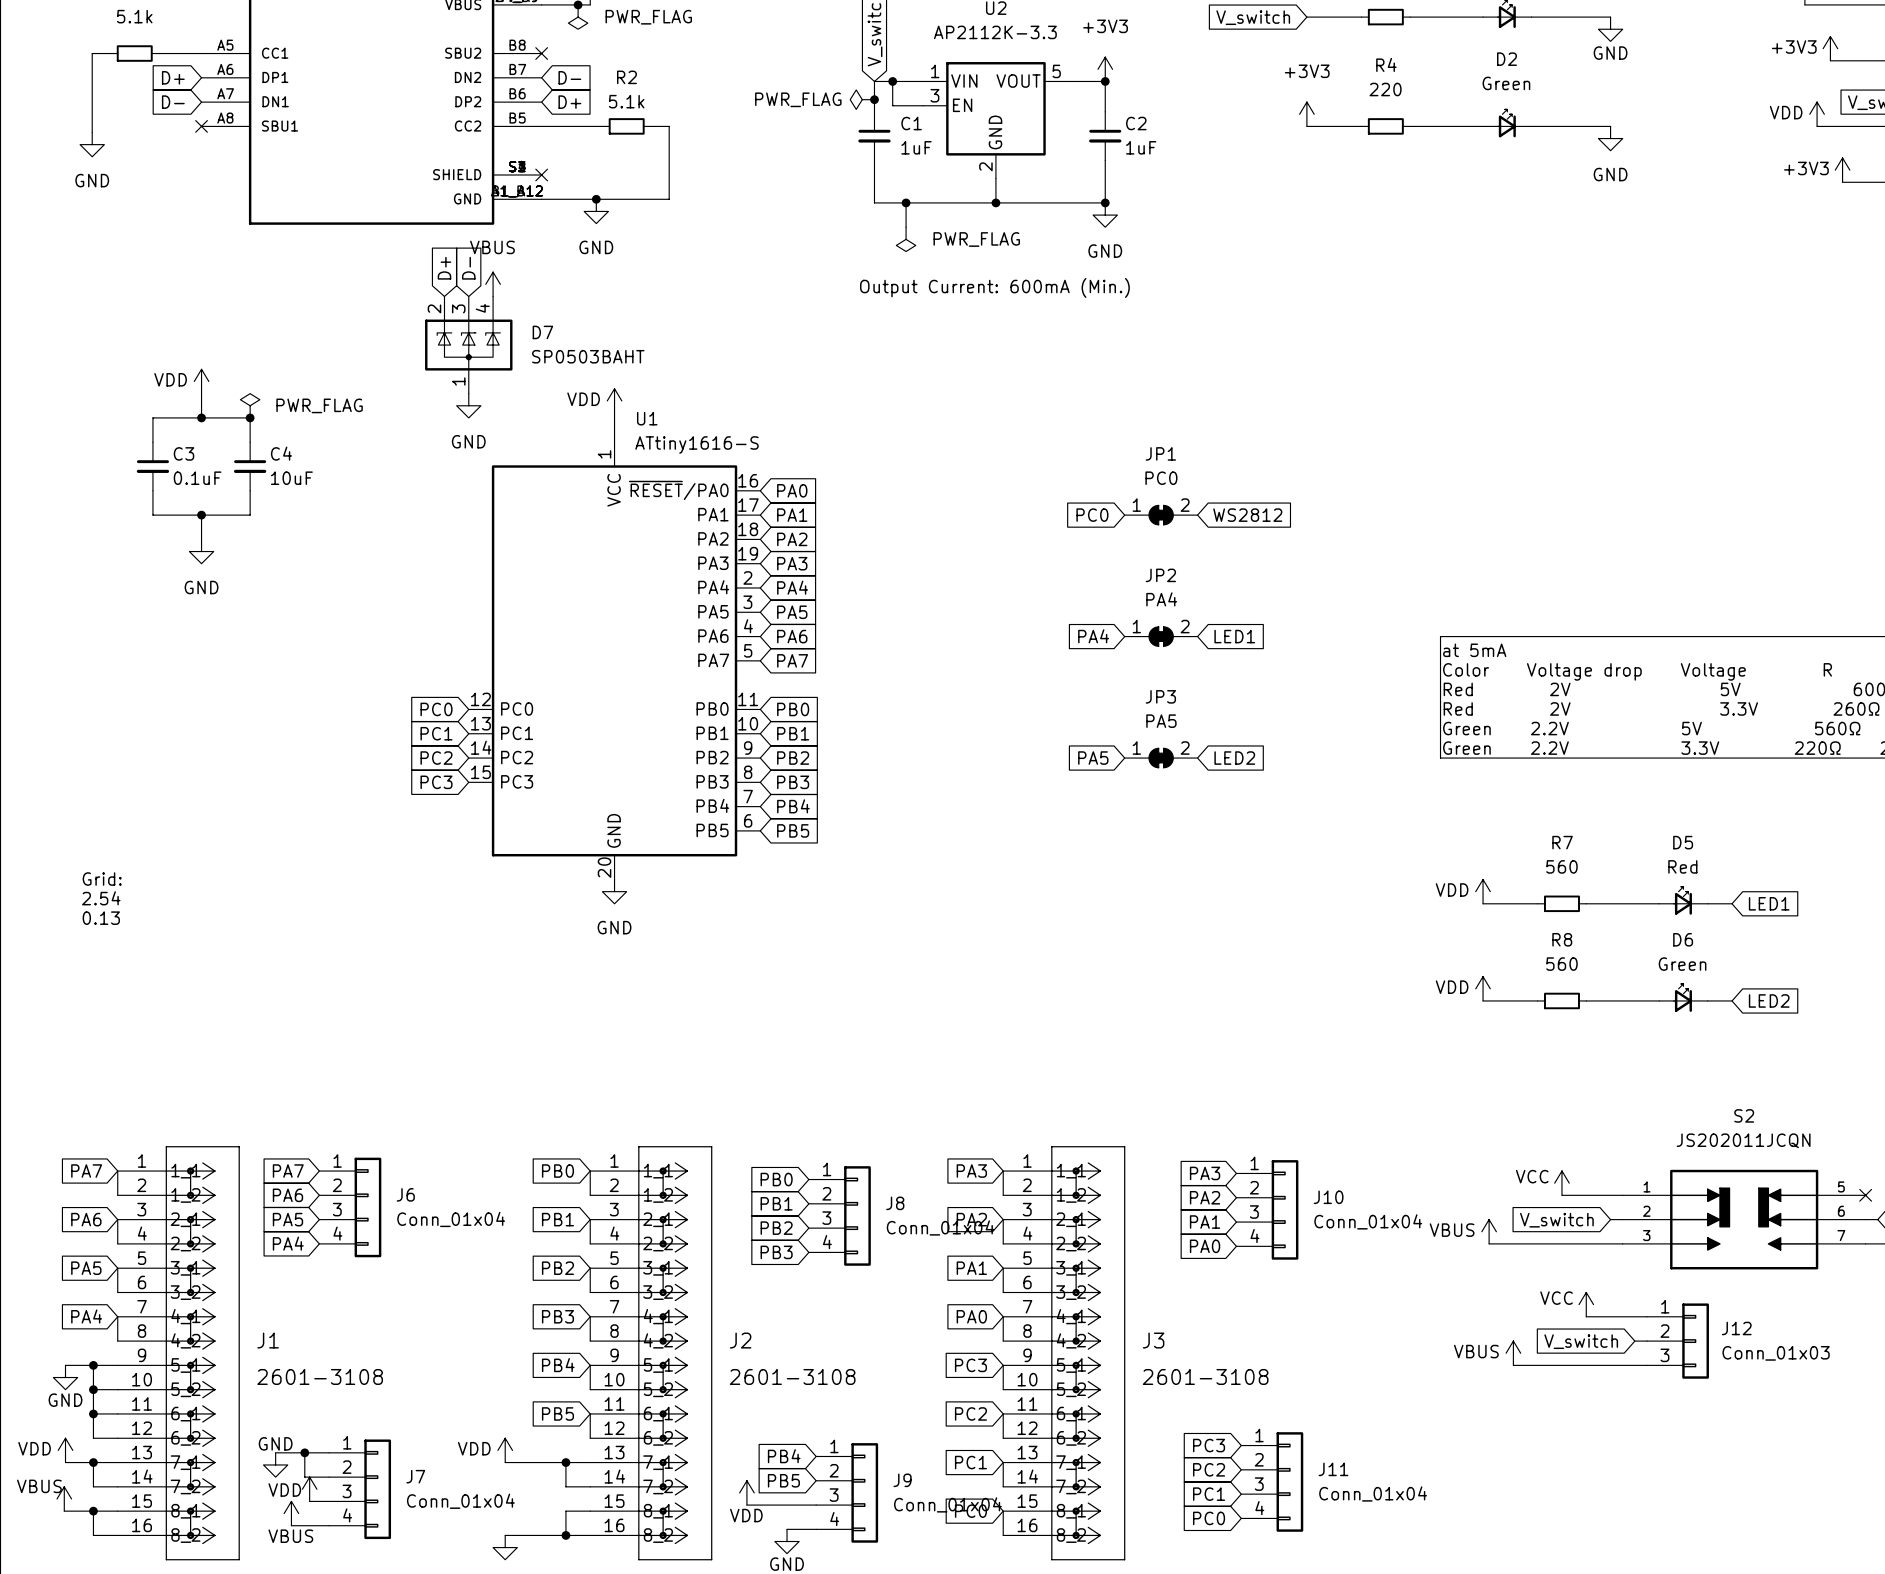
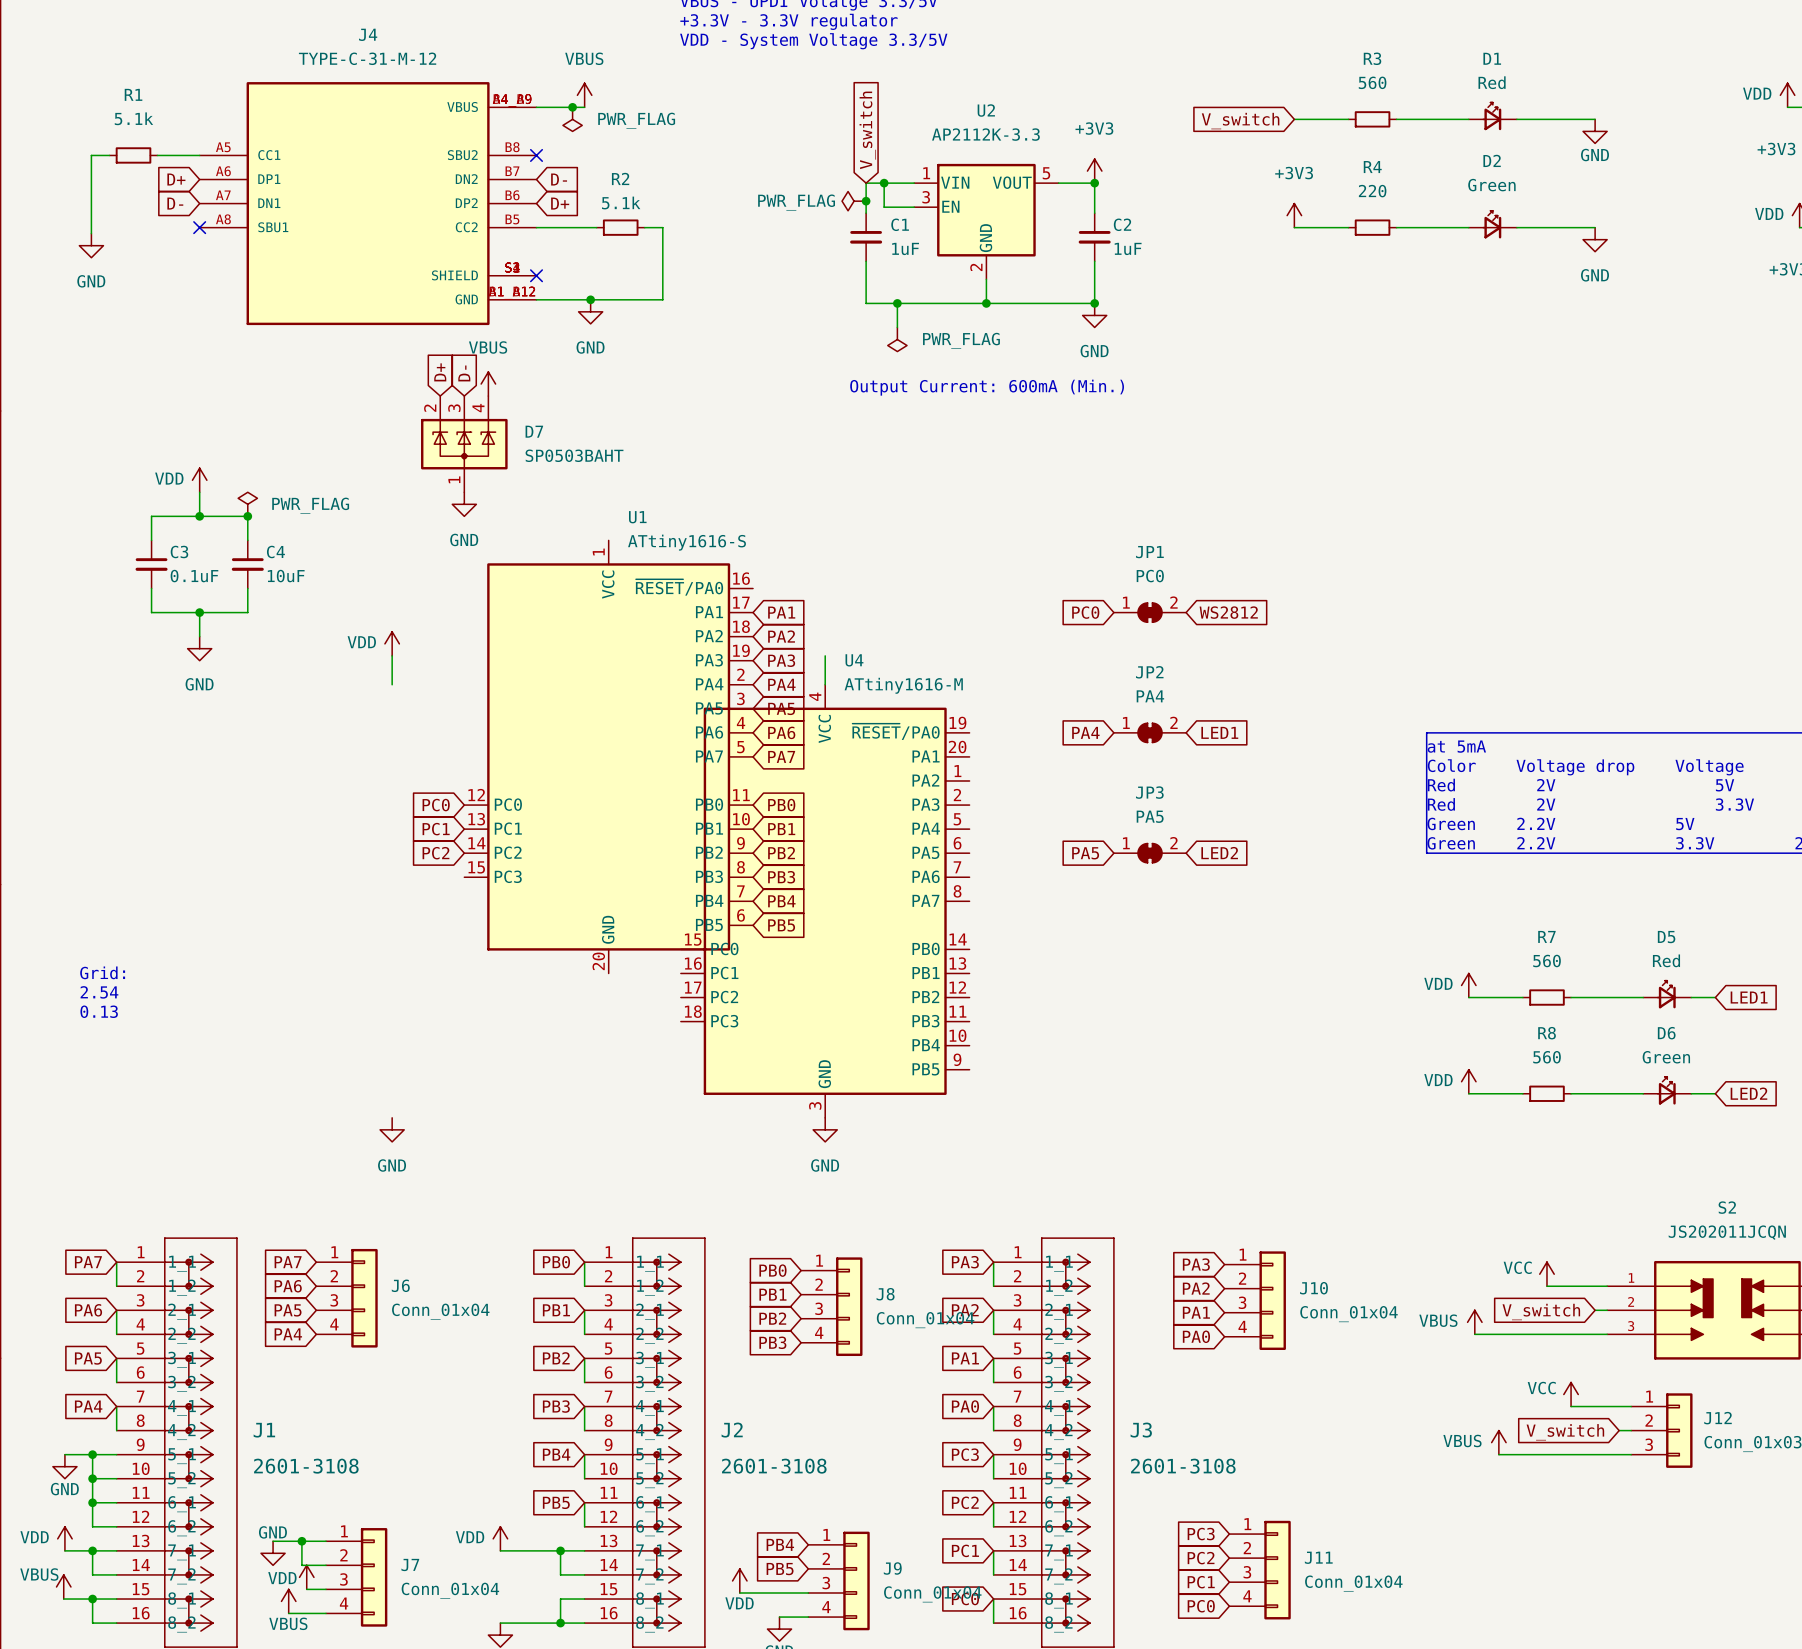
power symbol: VDD (614, 400) -> none
wire: (614, 413) (614, 442) -> none
global label: PA0 (792, 490) -> none
power symbol: none -> VDD (392, 643)
wire: none -> (392, 655) (392, 684)
wire: none -> (825, 655) (825, 684)
global label: PC3 (436, 782) -> none
U4: none -> ATtiny1616-M (825, 901)
power symbol: GND (614, 891) -> none
power symbol: none -> GND (392, 1129)
power symbol: none -> GND (825, 1129)

